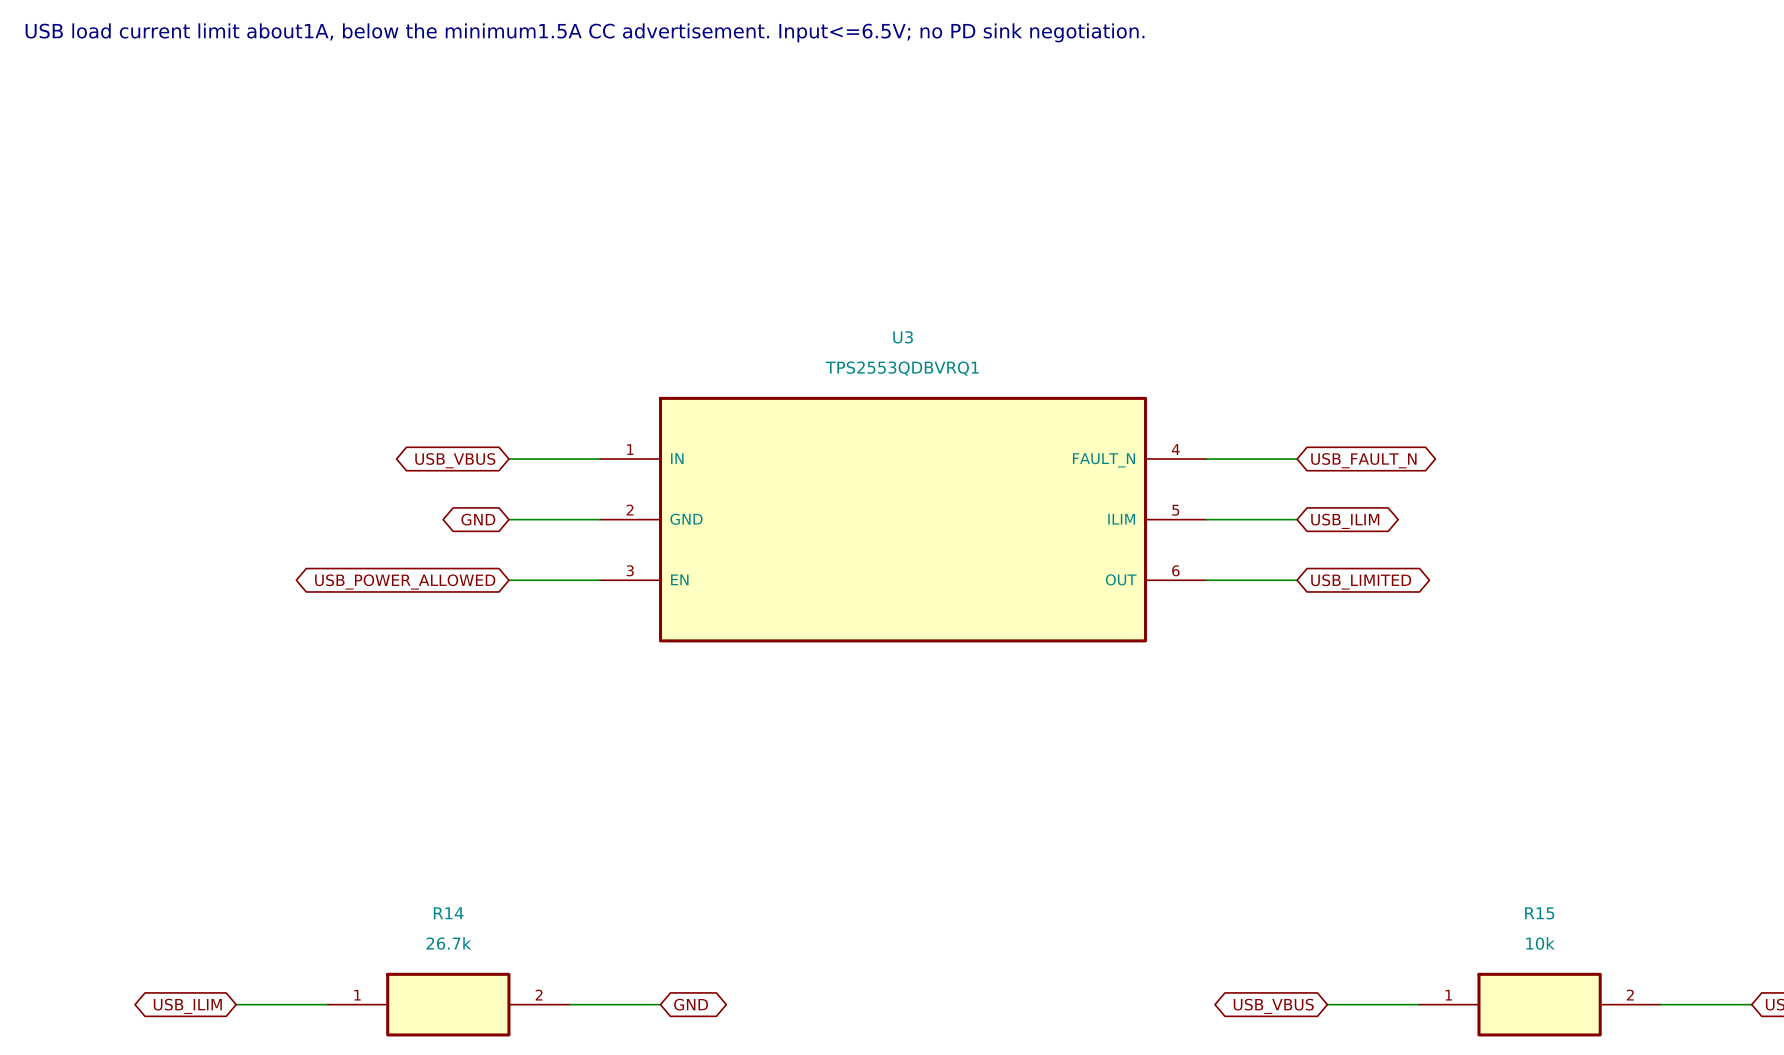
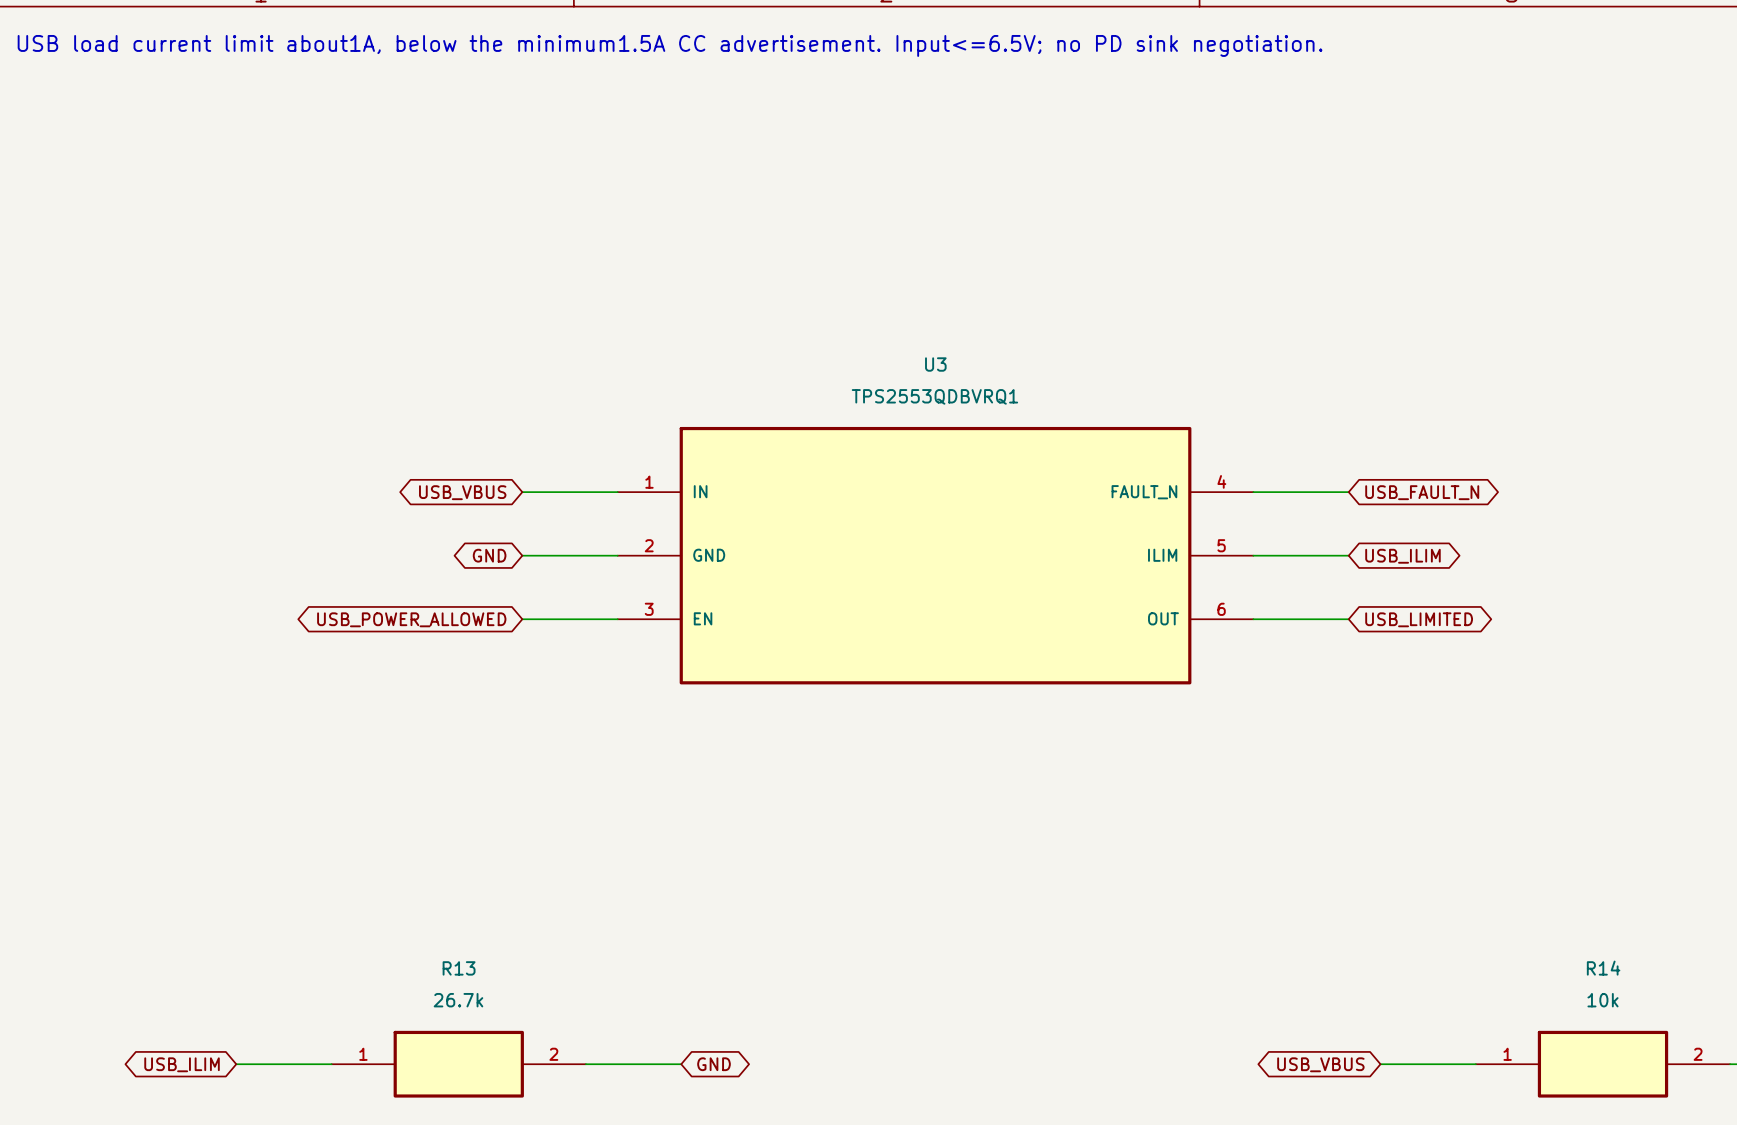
R14 name: R14 (448, 913) -> R13 (459, 968)
R15 name: R15 (1539, 913) -> R14 (1603, 968)

